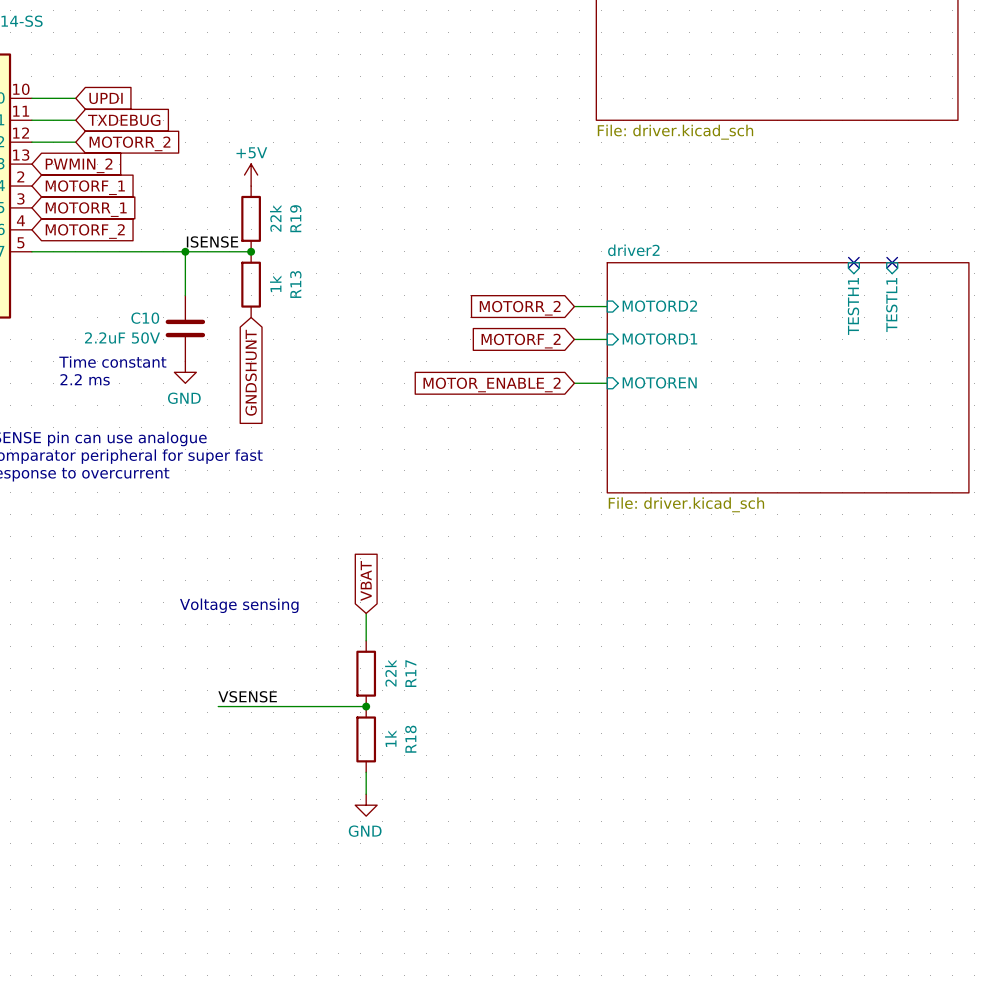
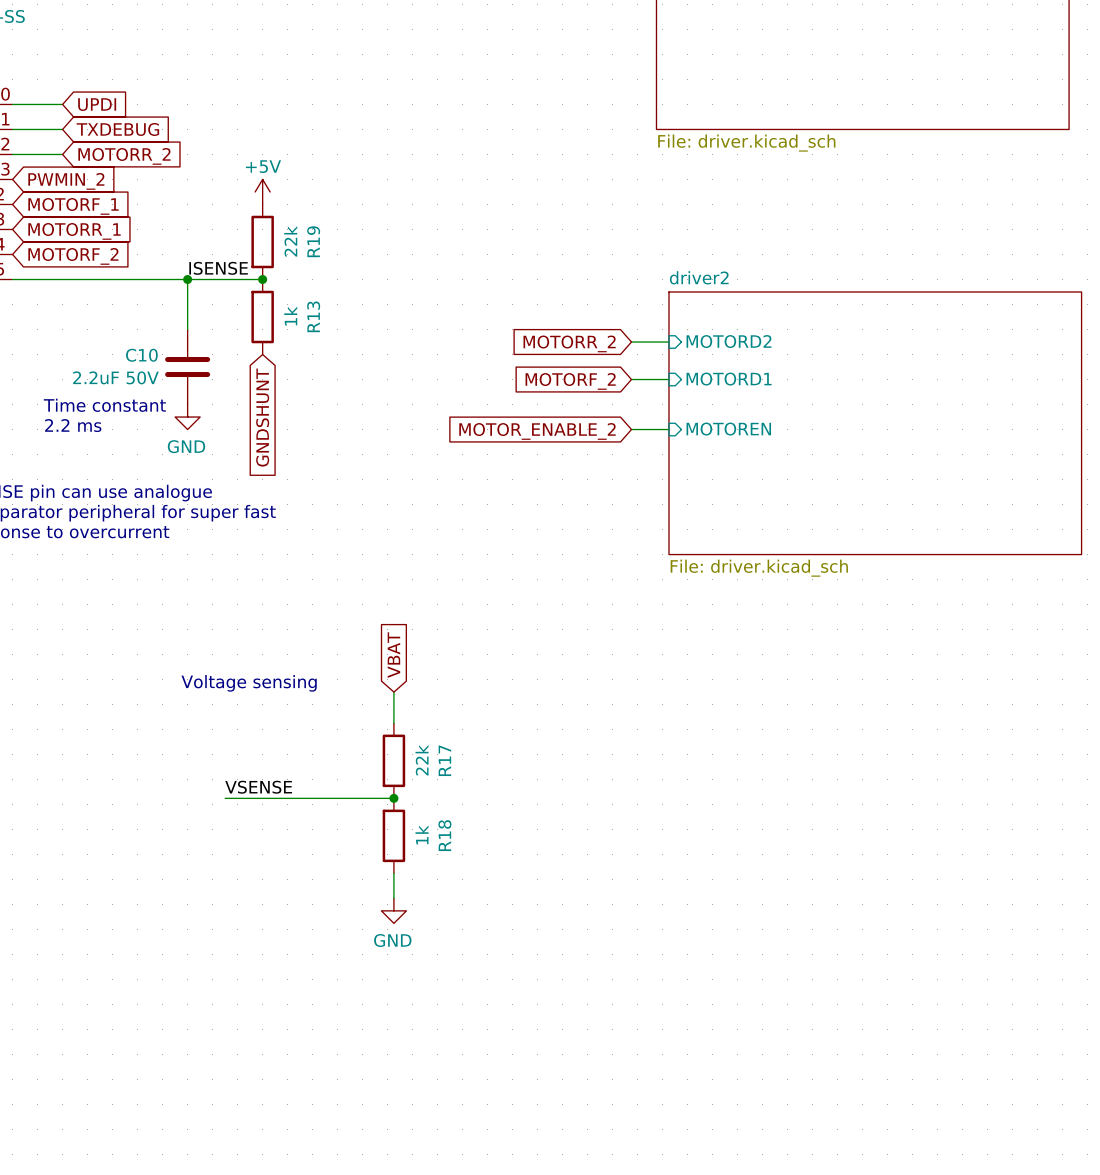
no-connect mark: (853, 262) -> none
no-connect mark: (892, 262) -> none
sheet pin: TESTL1 (891, 305) -> none
sheet pin: TESTH1 (853, 306) -> none

